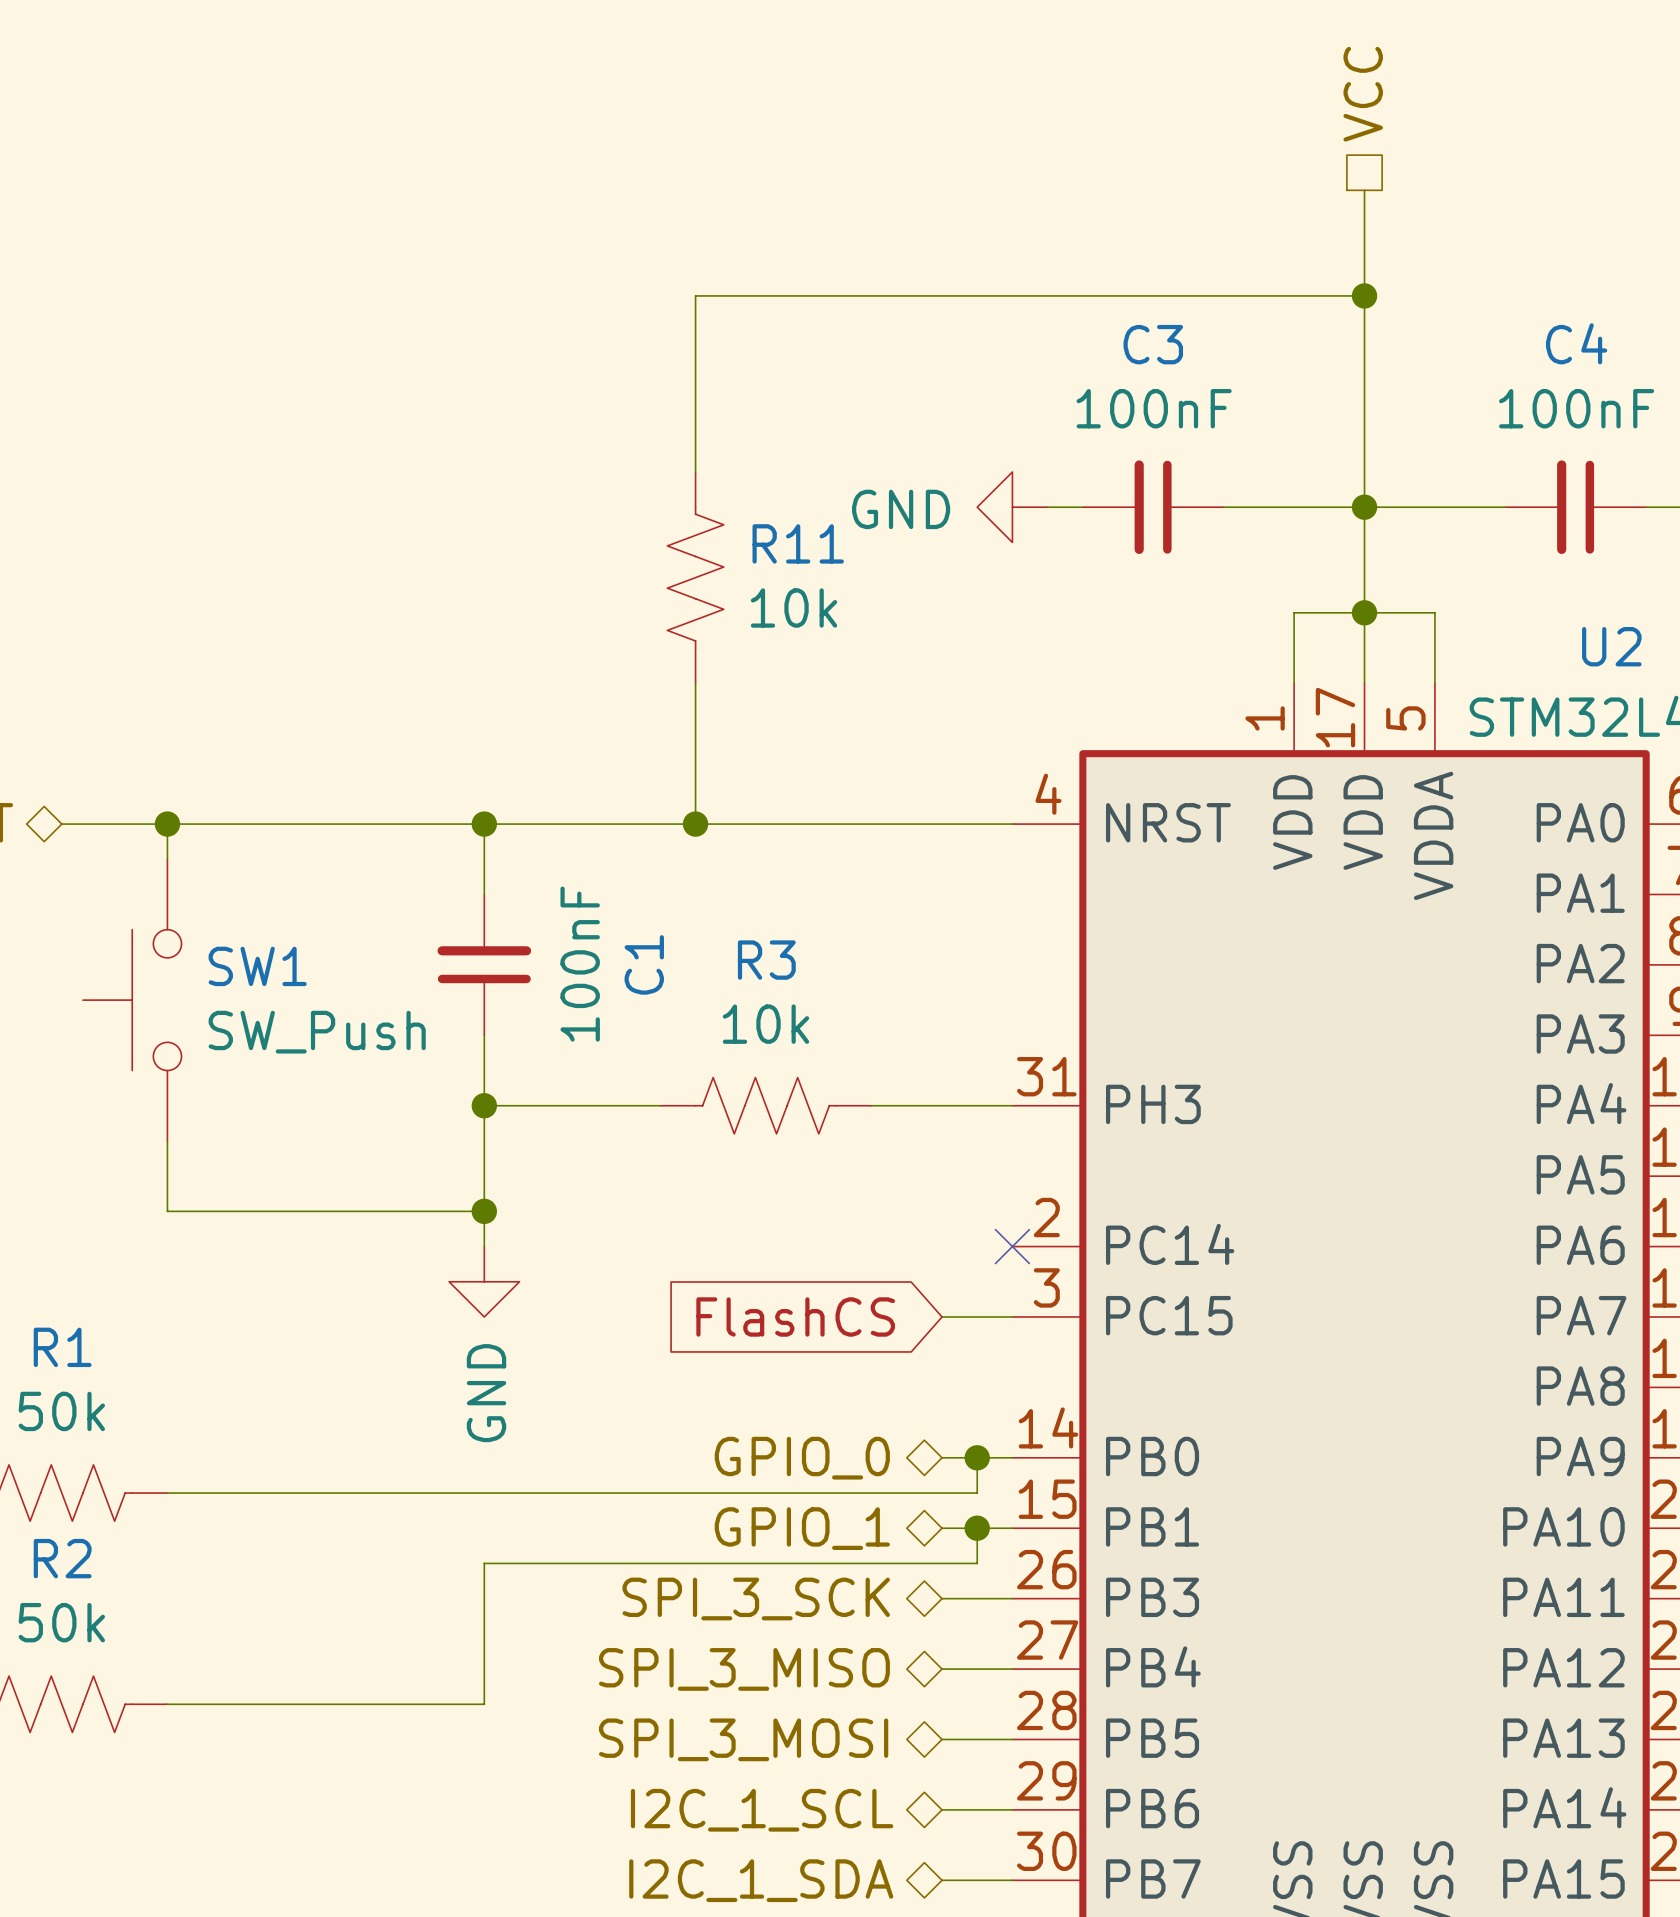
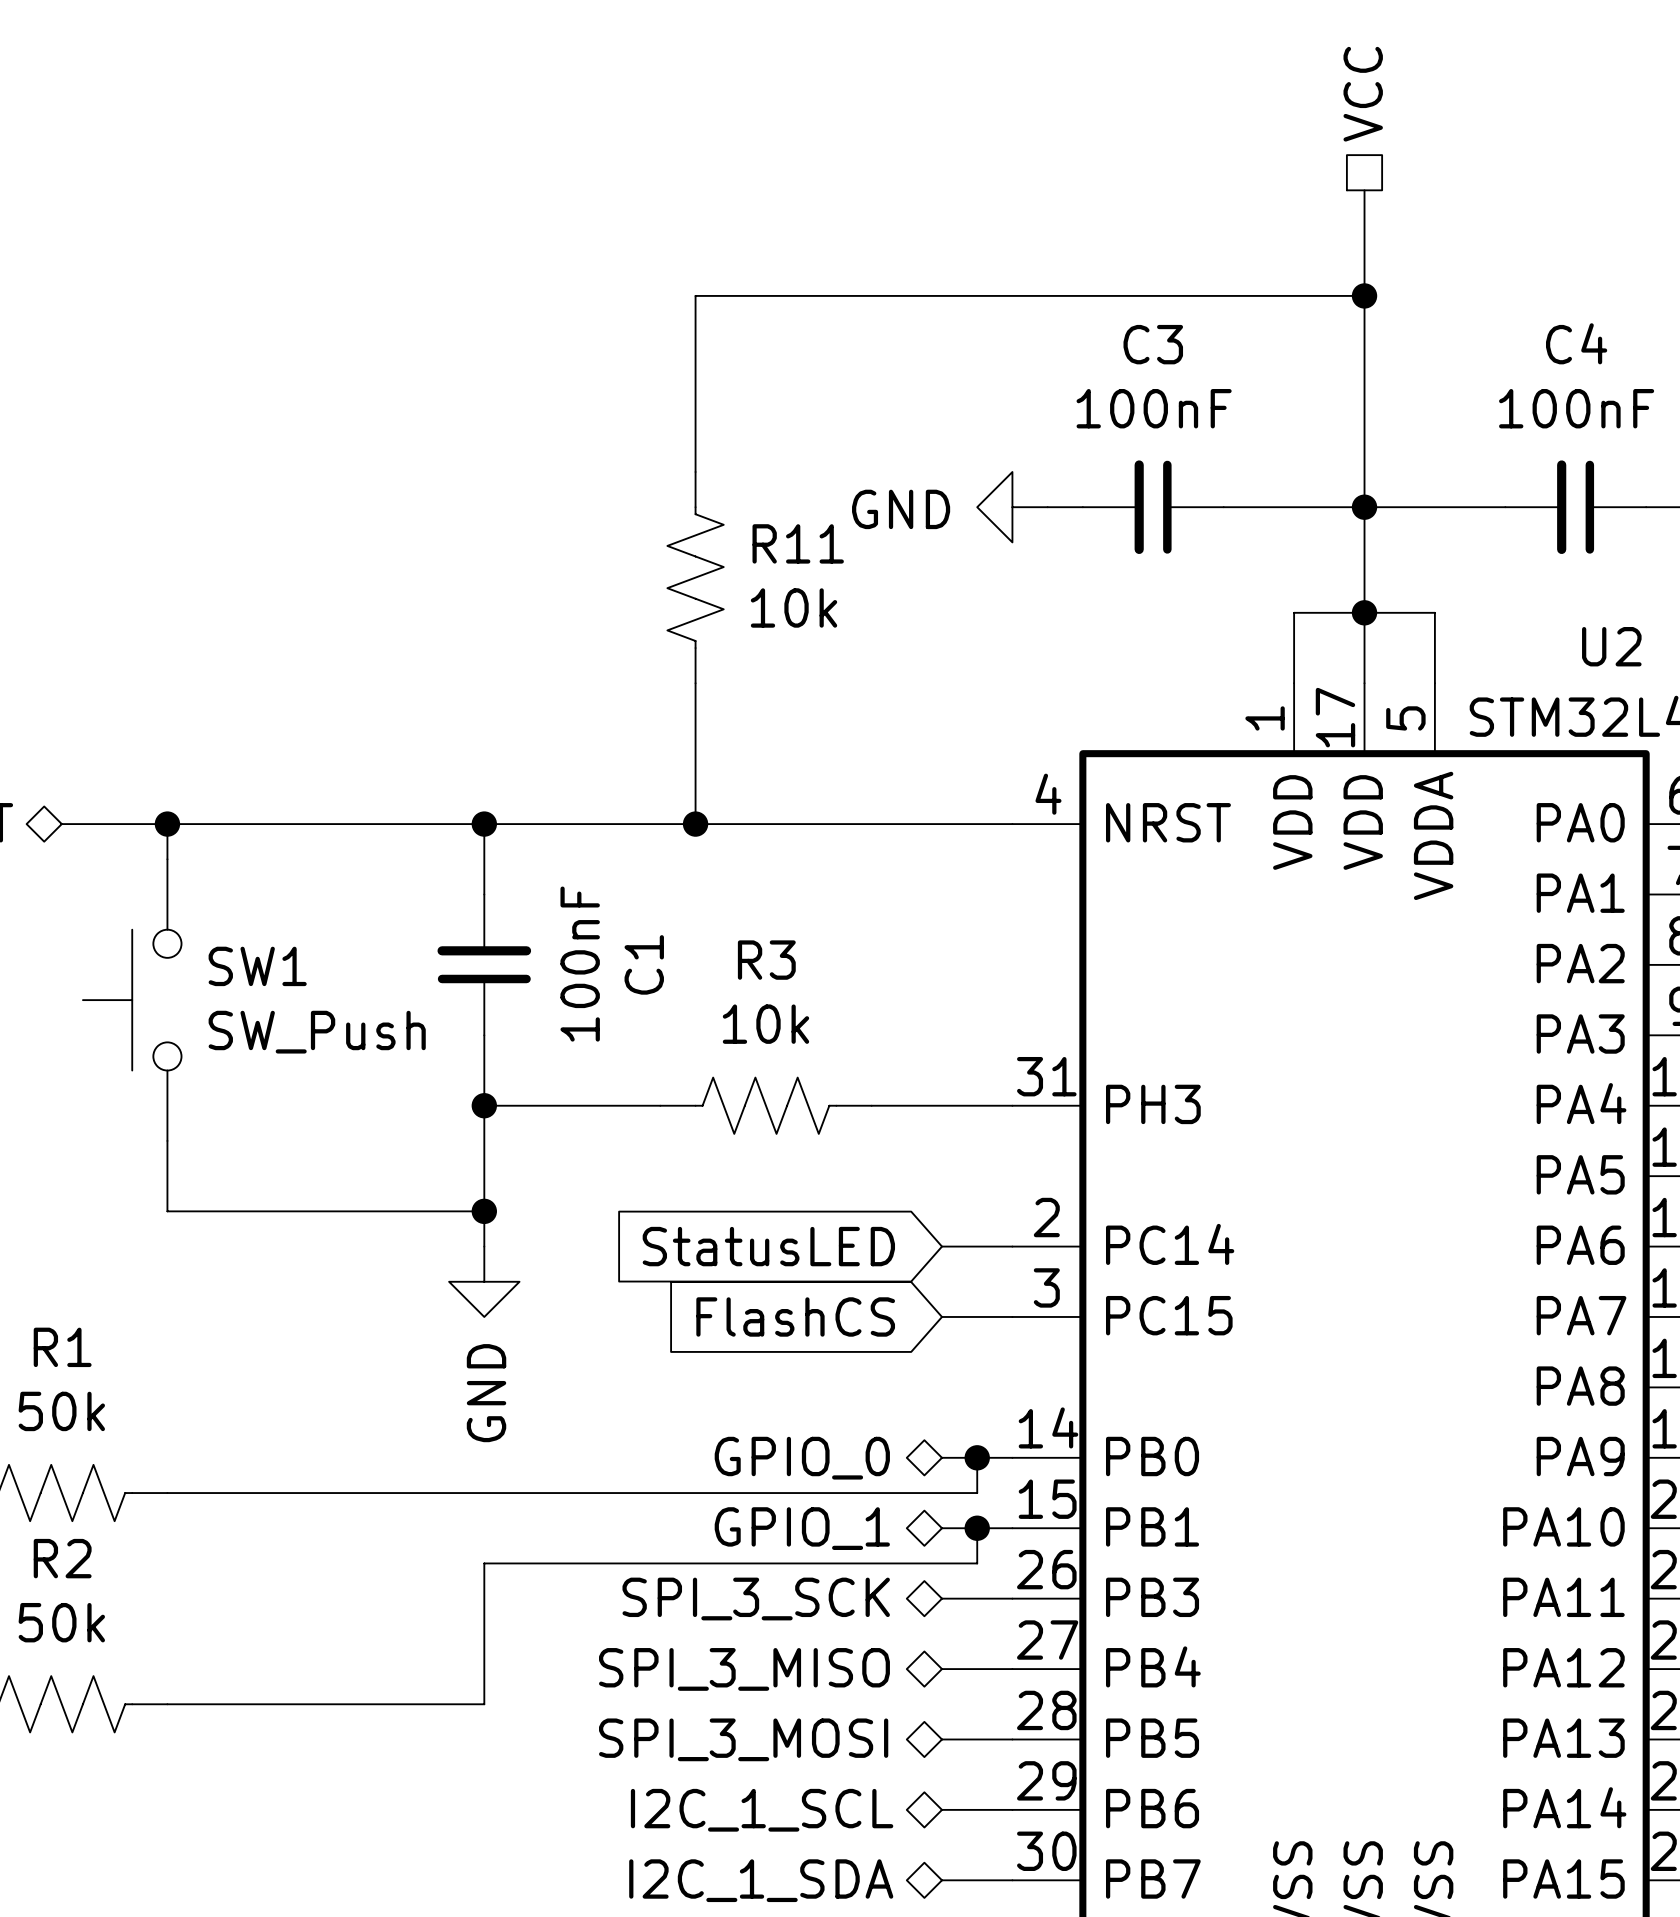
global label: none -> StatusLED (768, 1246)
wire: none -> (942, 1246) (1012, 1246)
no-connect mark: (1012, 1246) -> none

